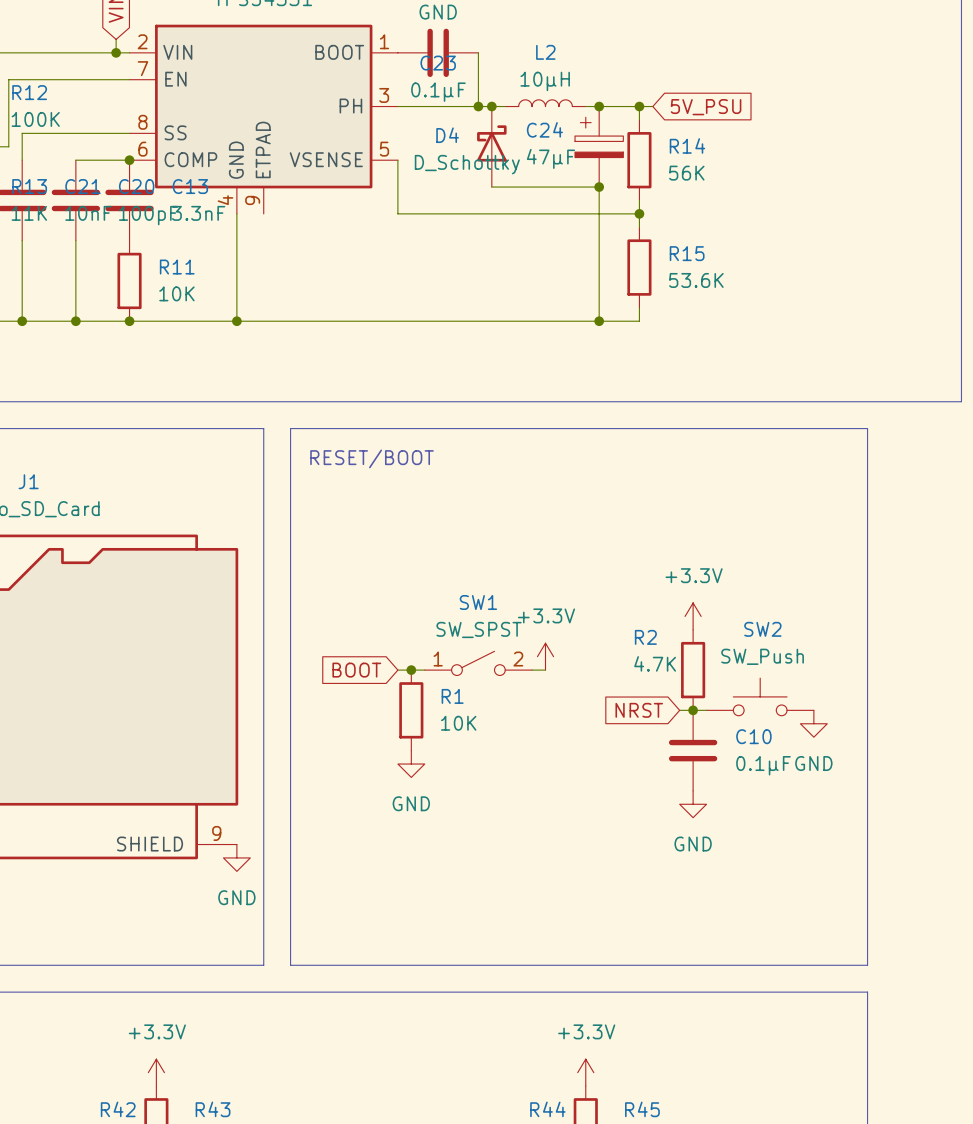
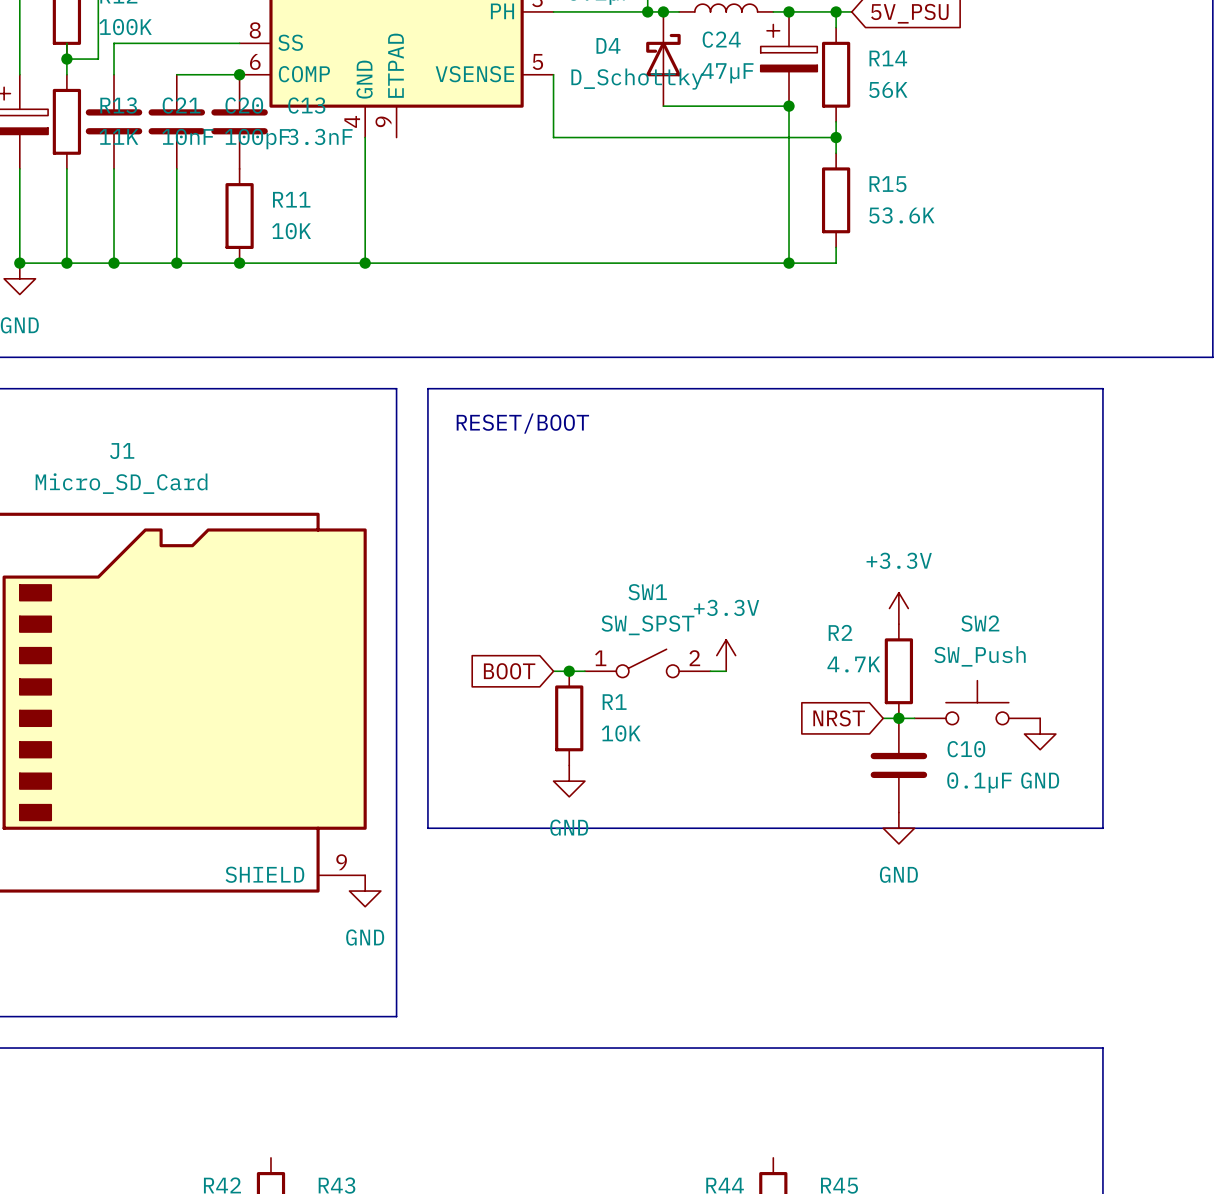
line: (290, 804) (290, 965) (867, 965) (867, 804) -> (427, 828) (1102, 828)
power symbol: +3.3V (156, 1072) -> none
power symbol: +3.3V (585, 1072) -> none

